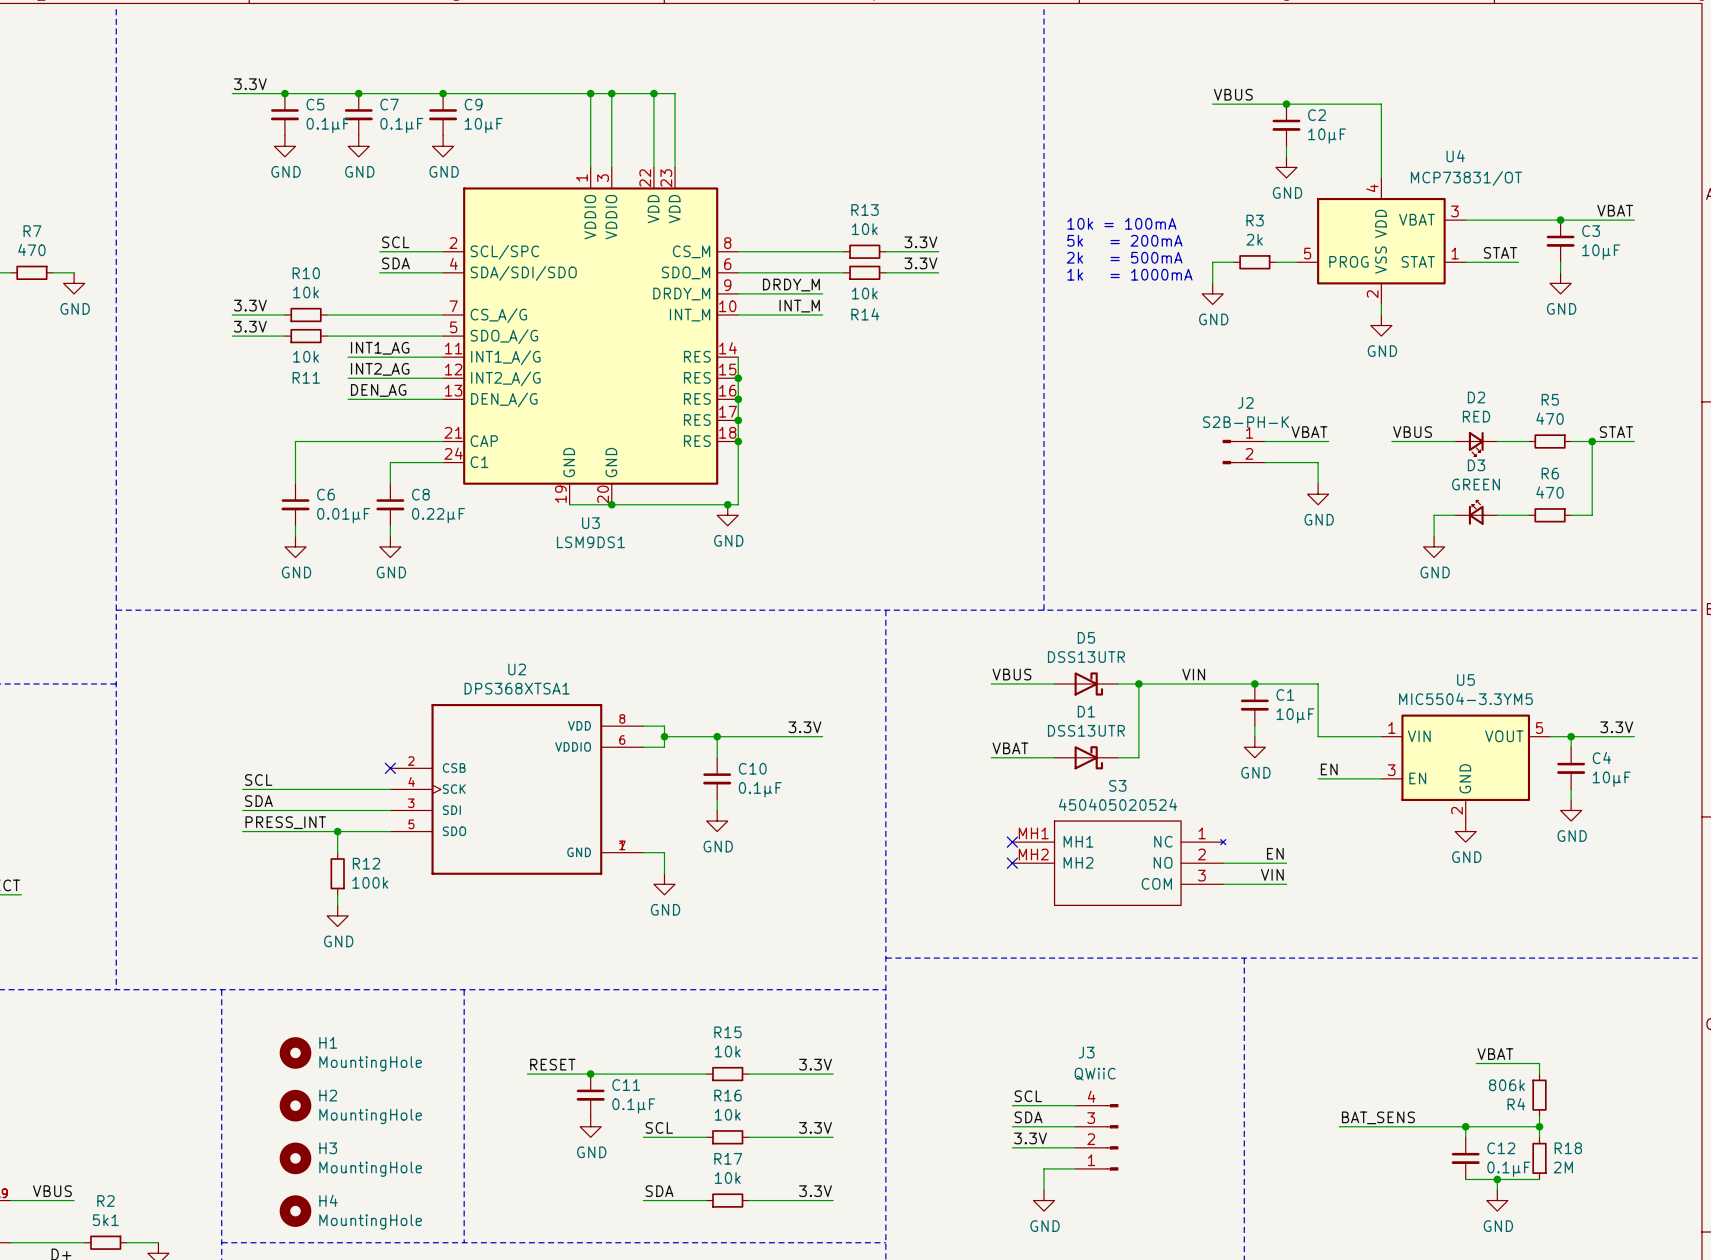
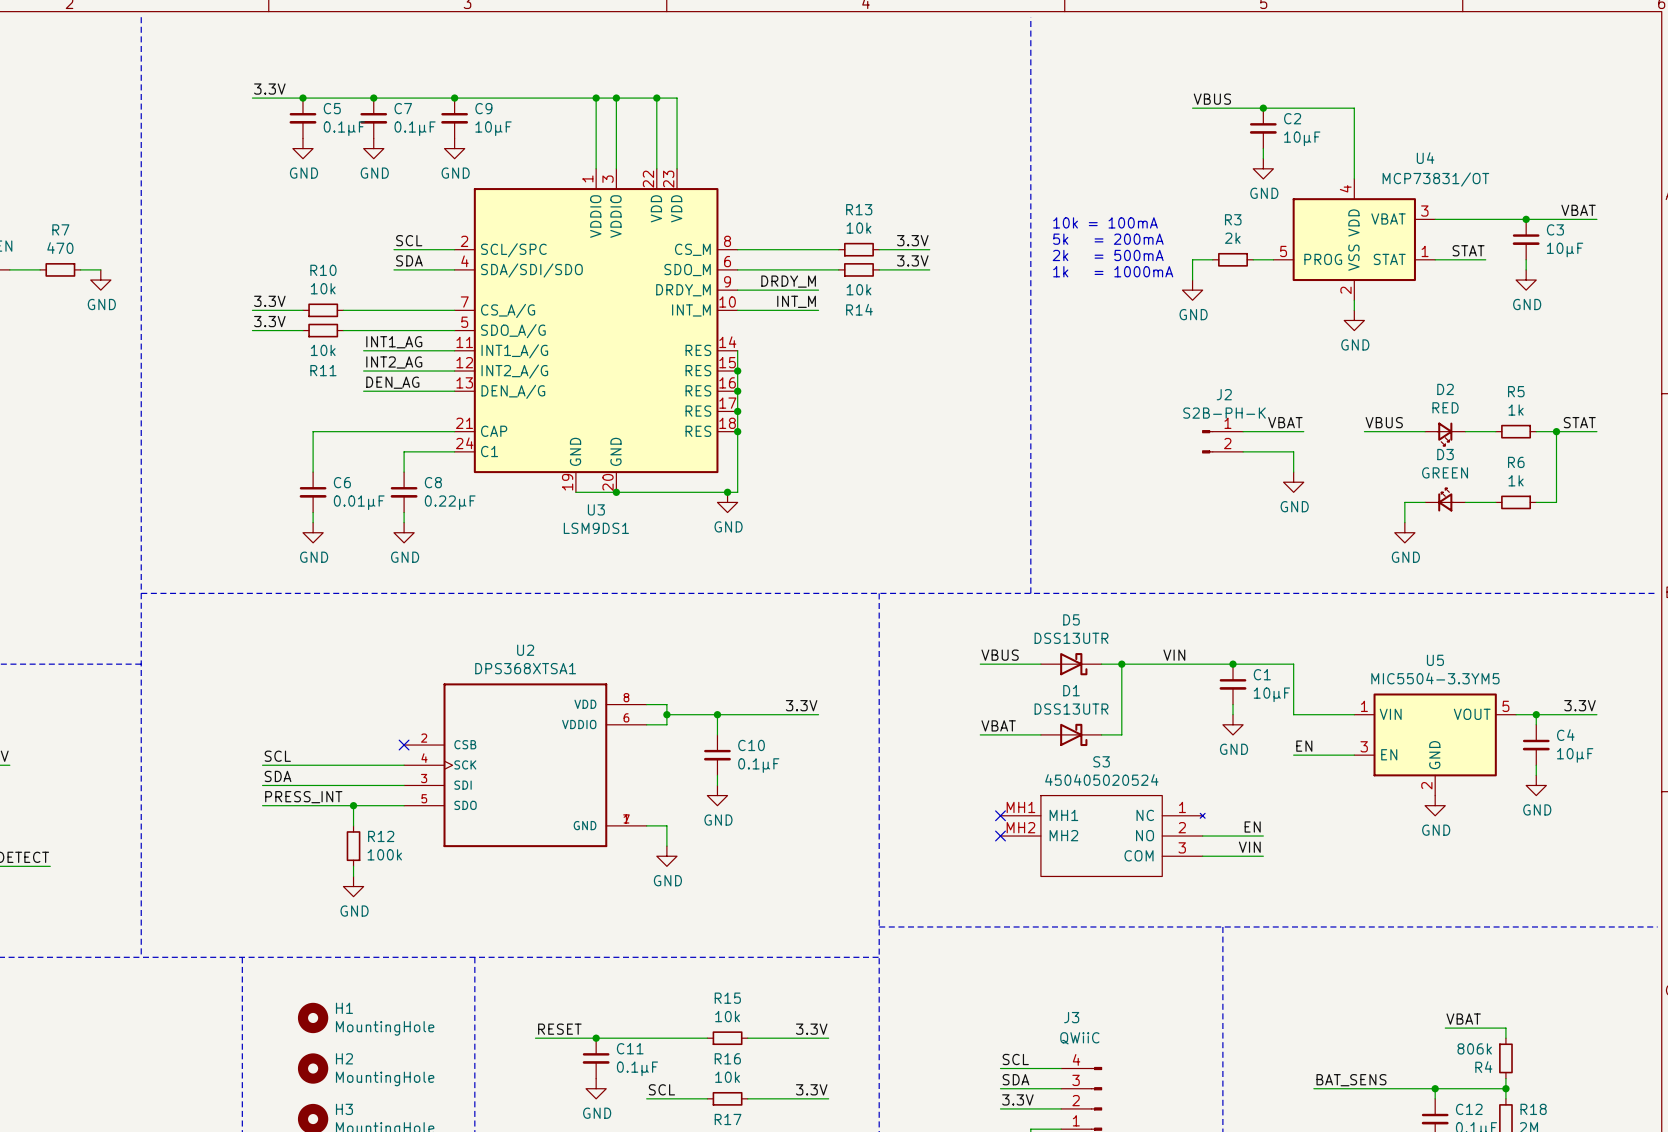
R5 value: 470 (1550, 418) -> 1k (1516, 410)
R6 value: 470 (1550, 492) -> 1k (1516, 480)

